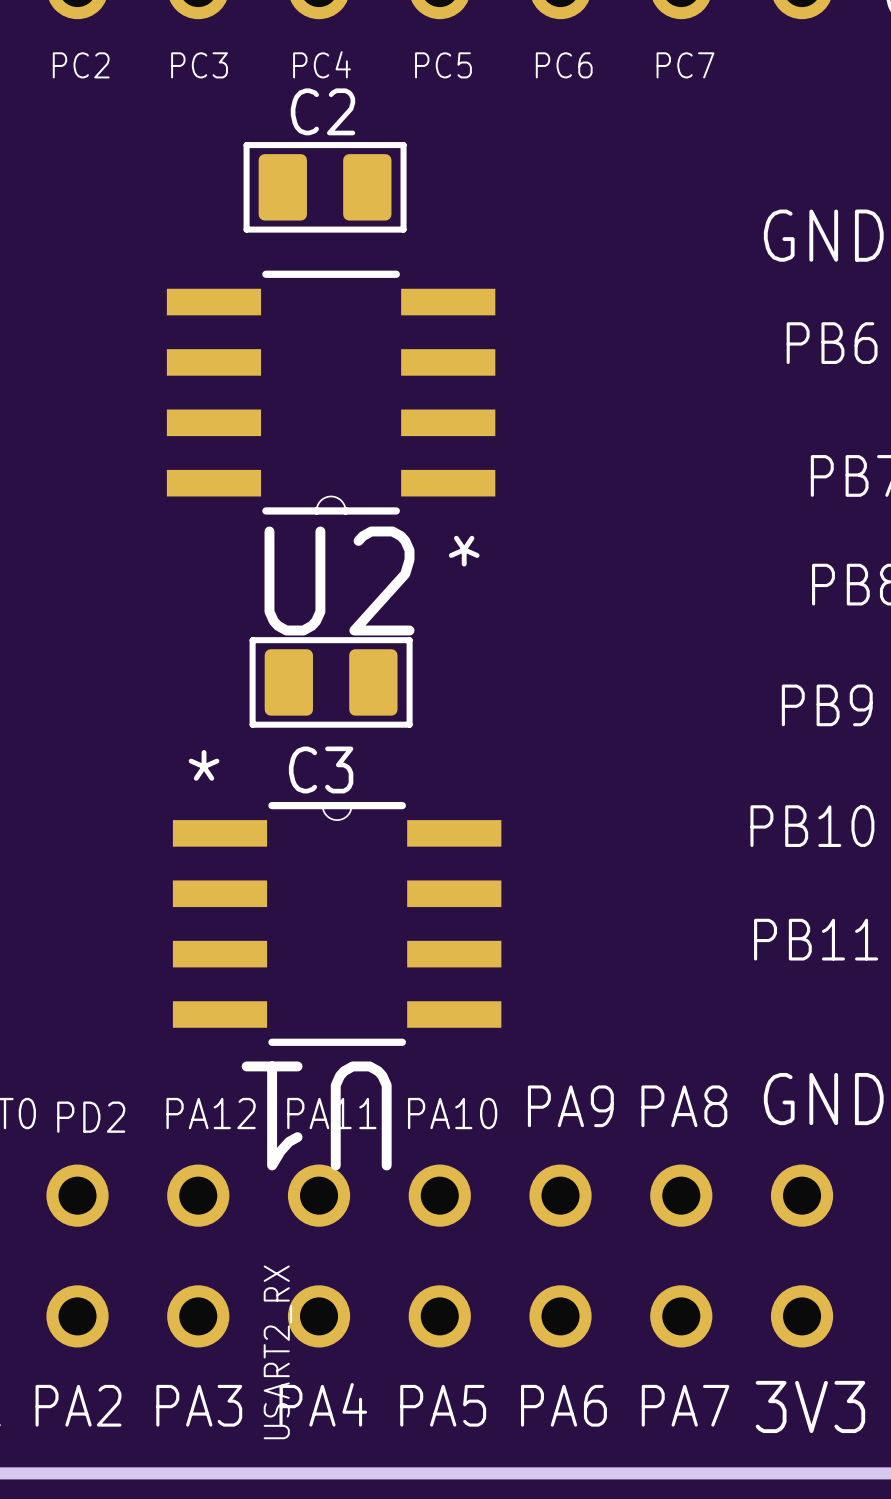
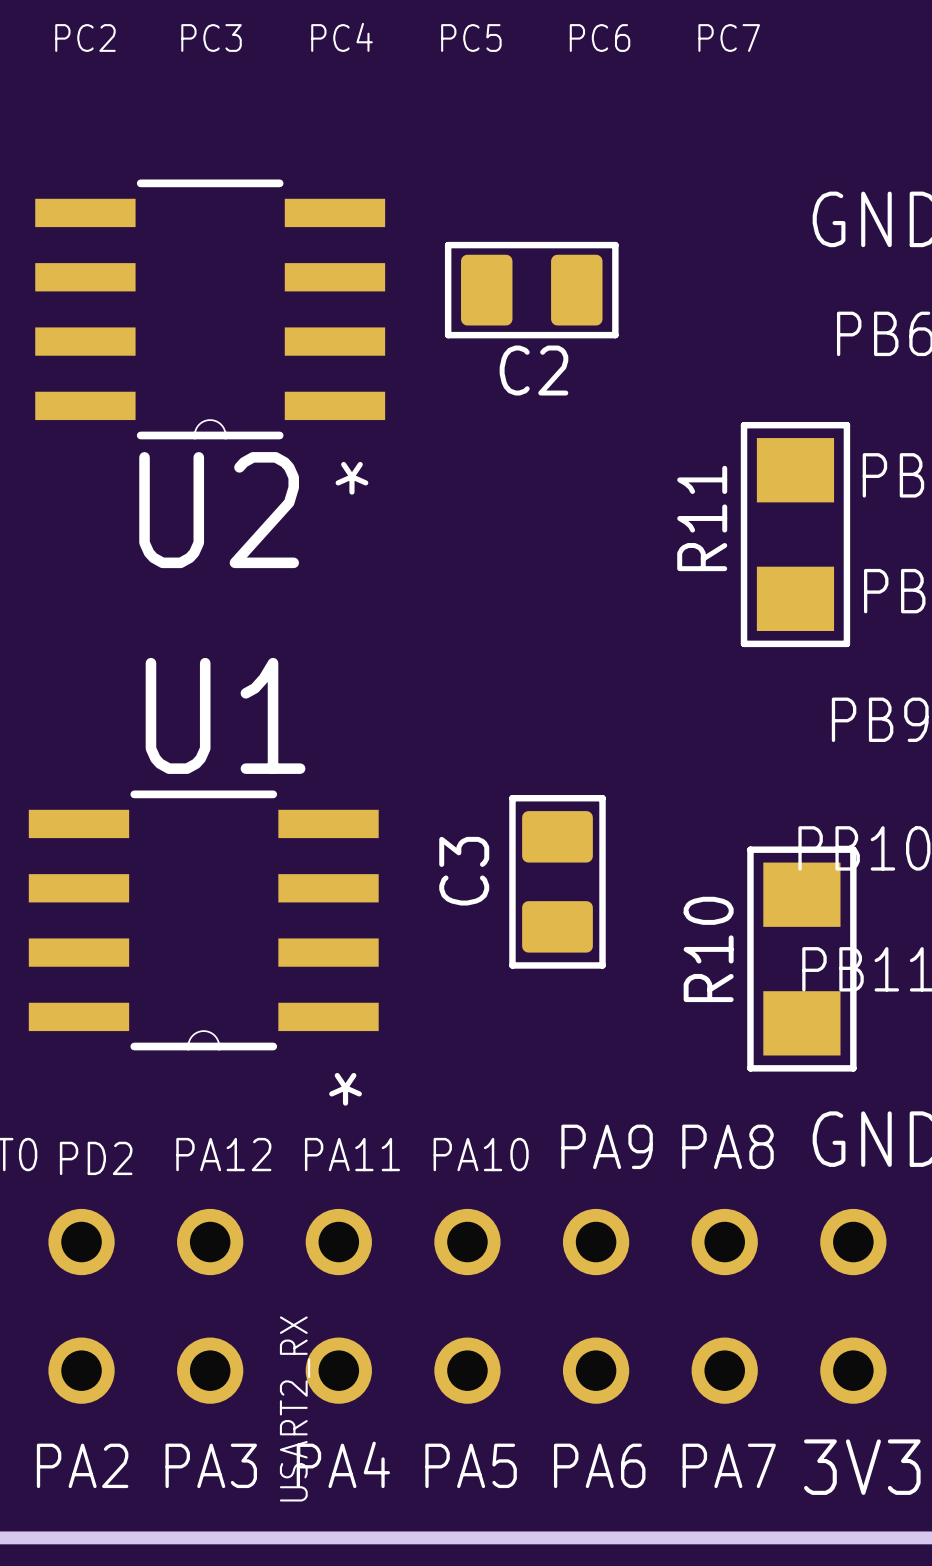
C2 name position: C2 (322, 111) -> C2 (533, 370)
C2 position: (325, 187) -> (531, 290)
U2 position: (331, 392) -> (210, 309)
R11: none -> (795, 534)
C3 rotation: 0° (331, 682) -> 90° clockwise (557, 881)
C3 position: (331, 682) -> (557, 881)
U1 rotation: 0° (337, 923) -> 180° (203, 920)
R10: none -> (801, 959)

